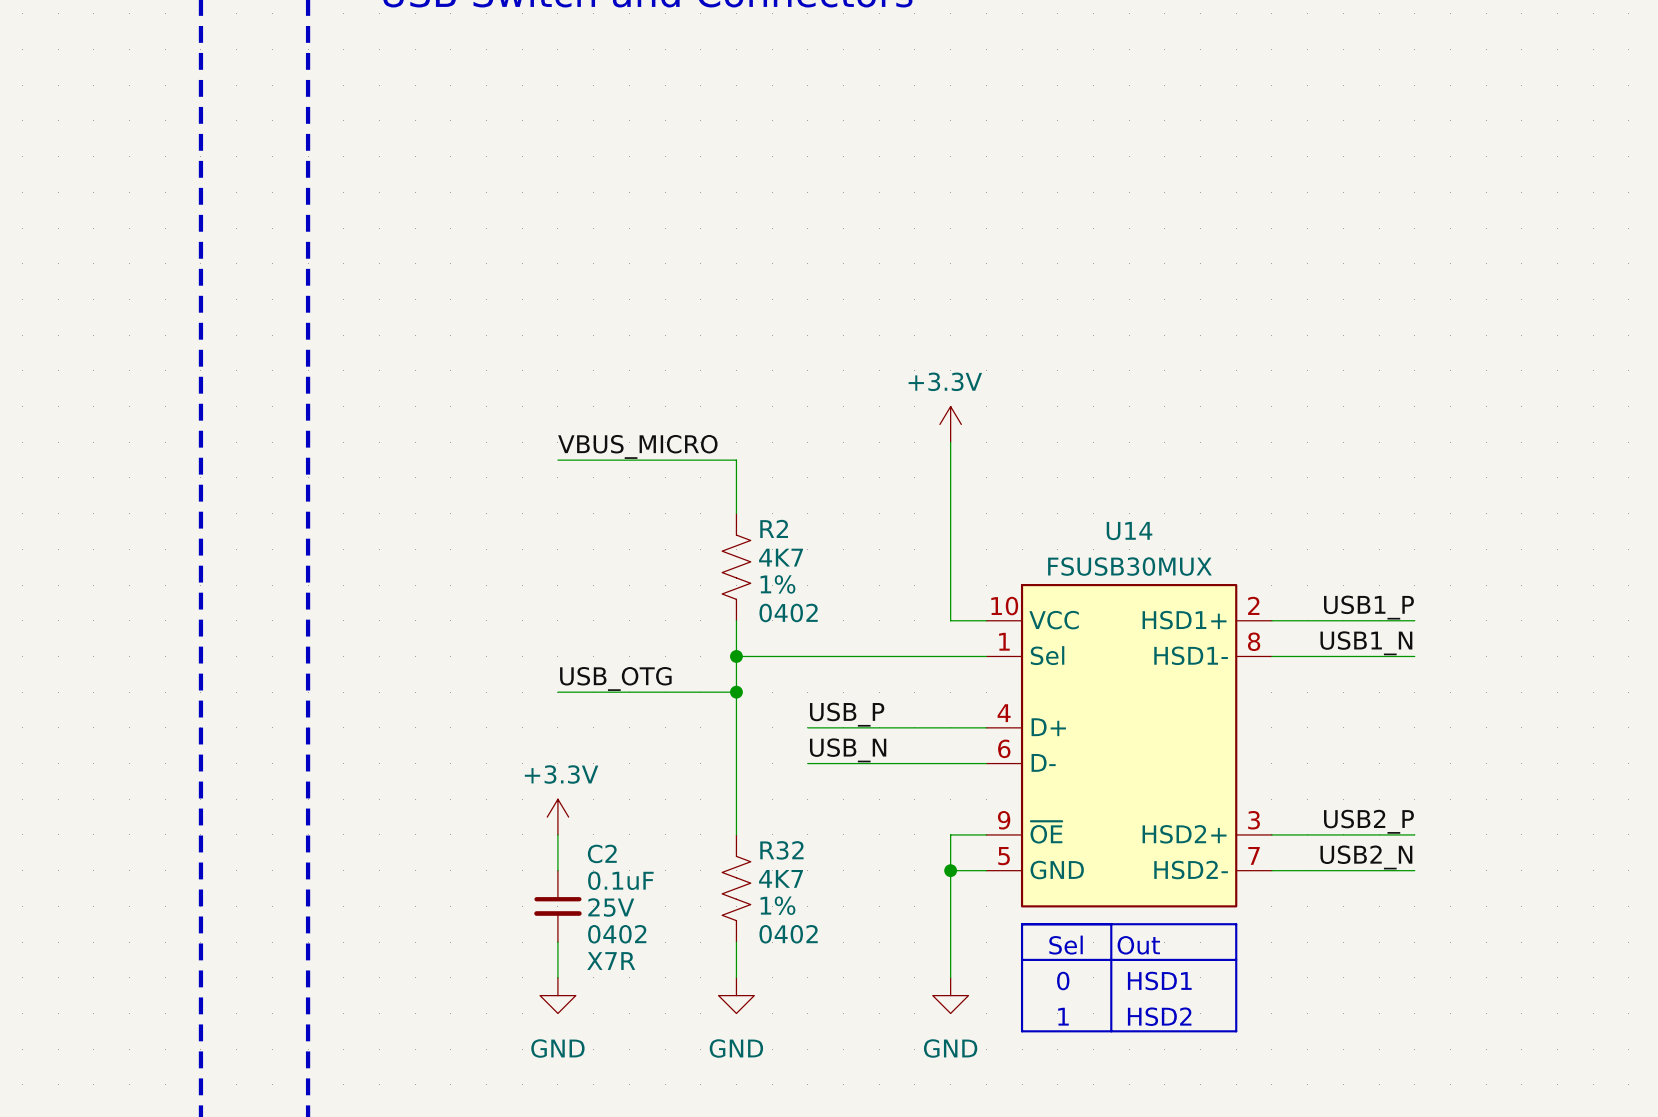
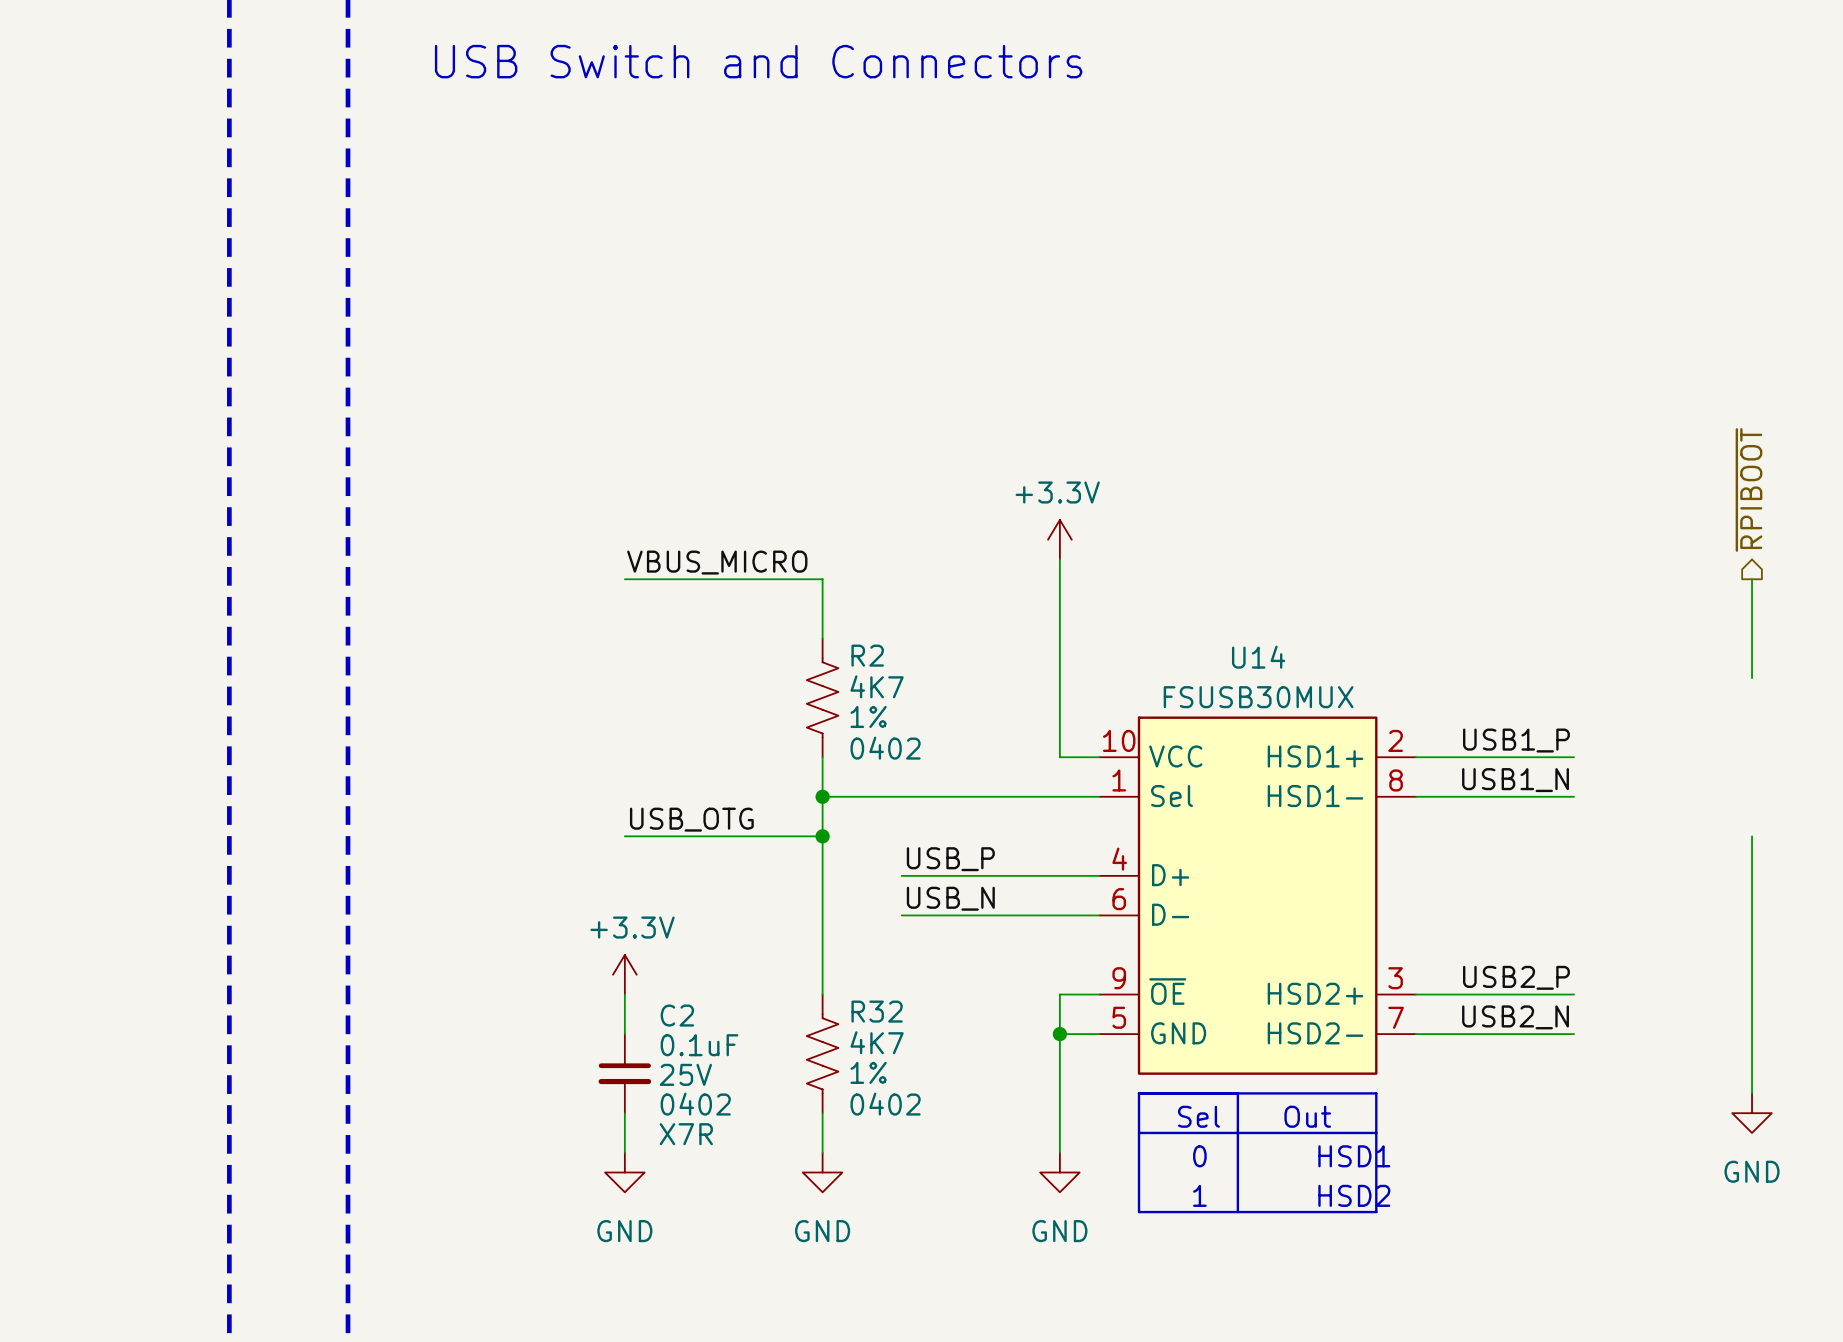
hierarchical label: none -> ~{RPIBOOT} (1749, 489)
wire: none -> (1752, 579) (1752, 678)
wire: none -> (1752, 836) (1752, 1093)
power symbol: none -> GND (1752, 1113)

